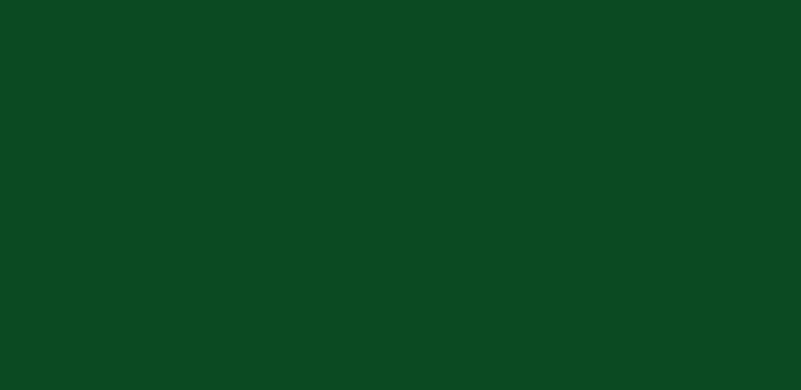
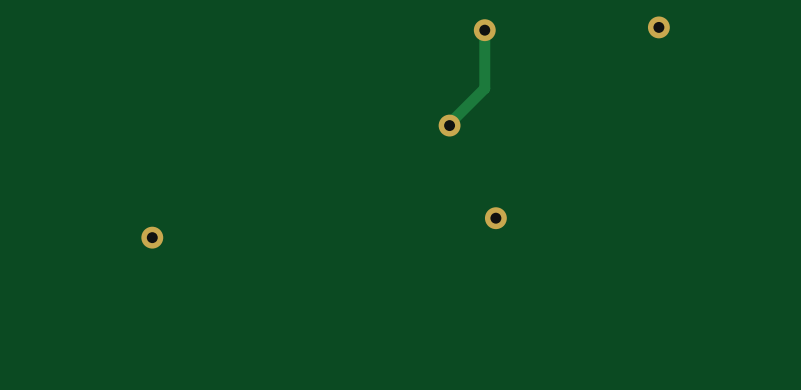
via: none -> (658, 27)
track: none -> (484, 30) (484, 88) (449, 125)
via: none -> (484, 30)
via: none -> (449, 125)
via: none -> (495, 218)
via: none -> (152, 237)

